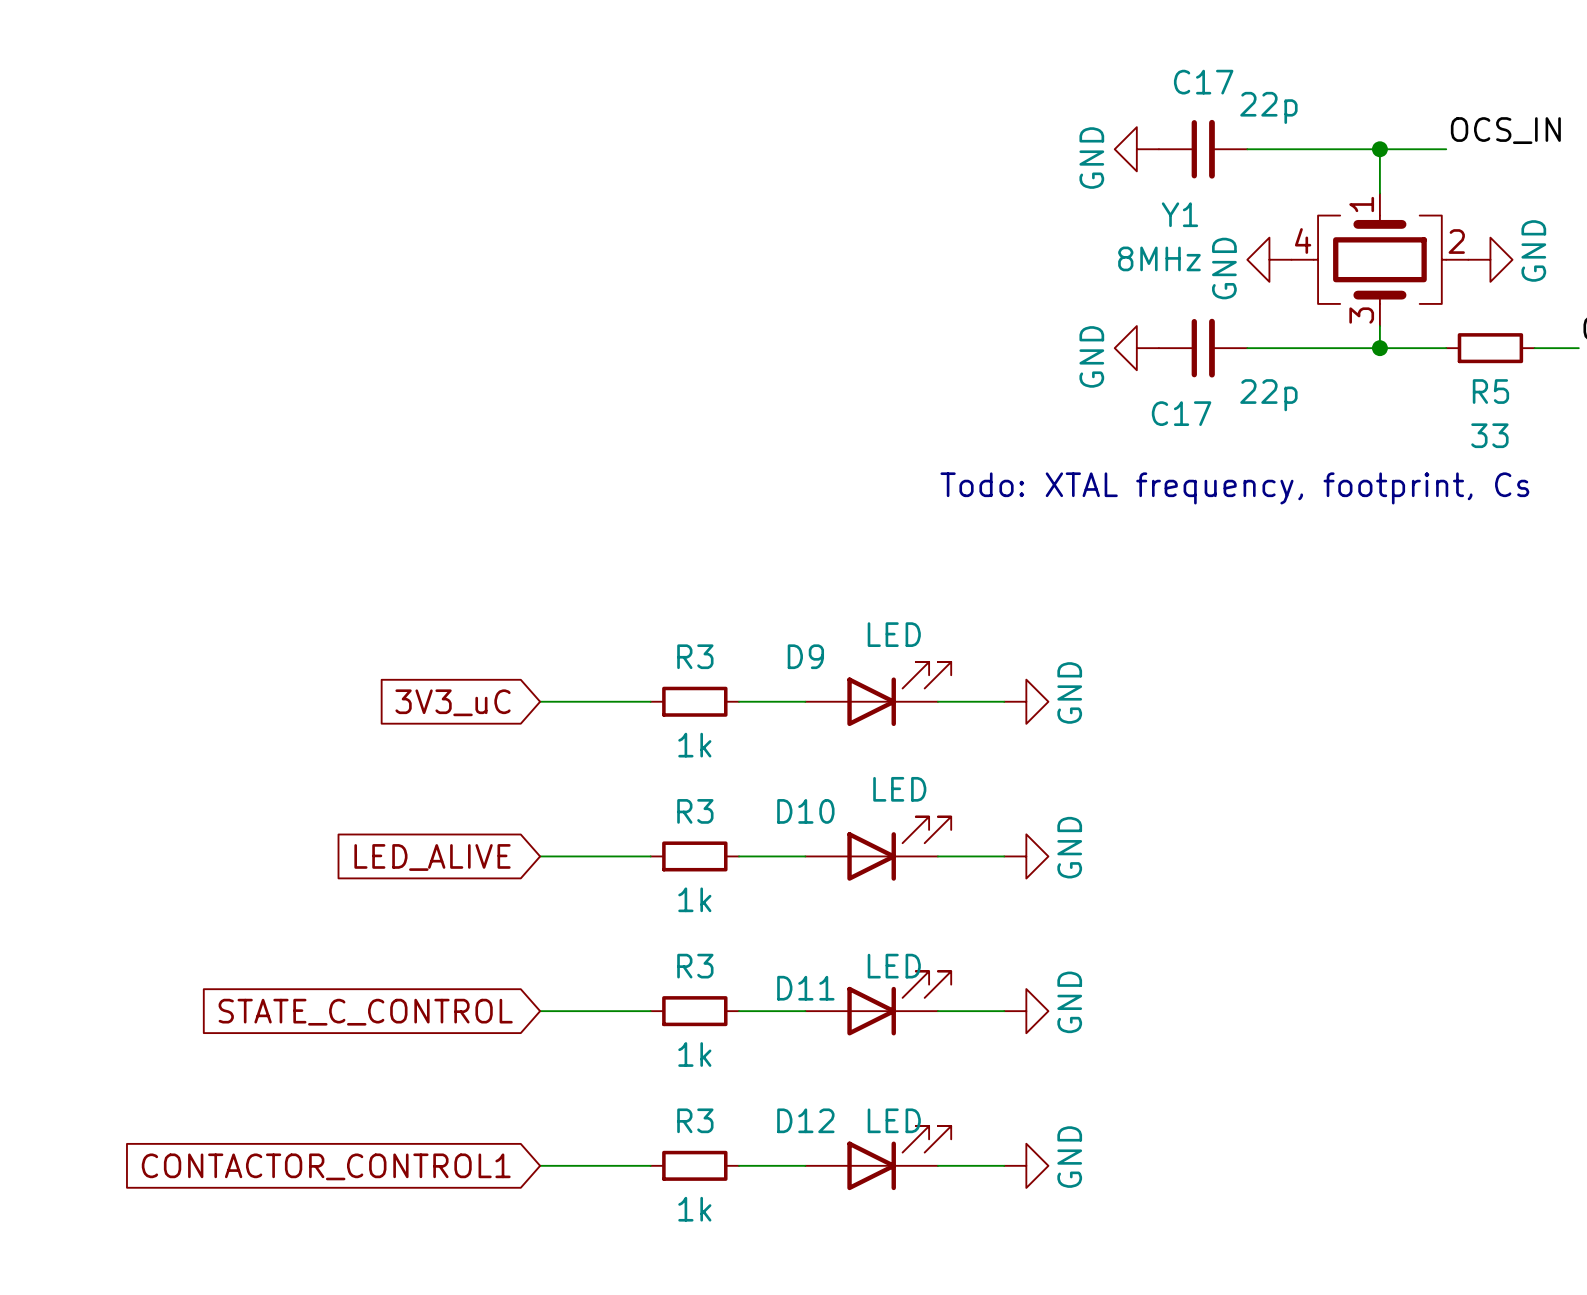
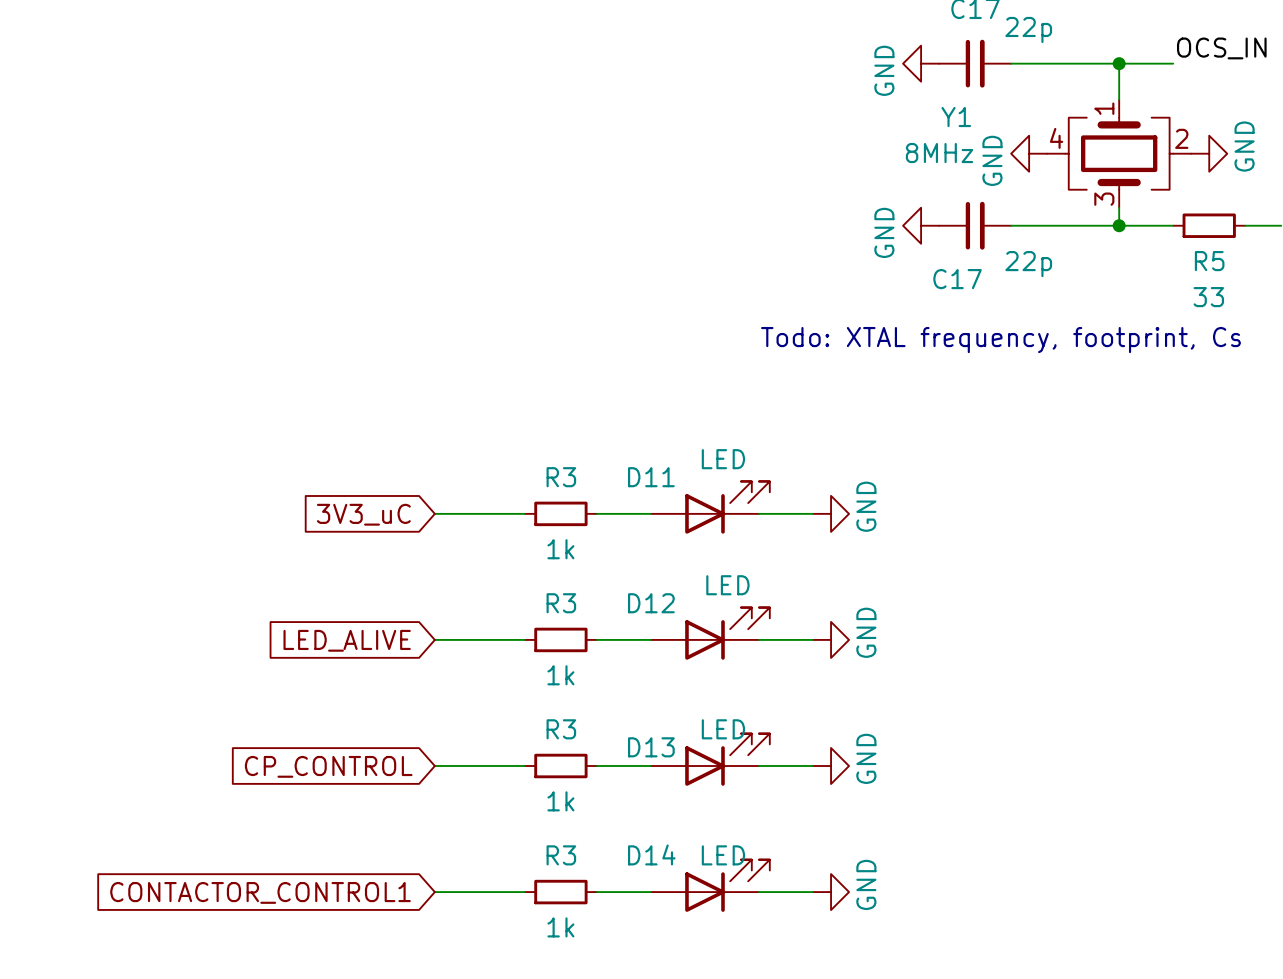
D9 name: D9 (805, 656) -> D11 (651, 477)
D10 name: D10 (805, 811) -> D12 (651, 603)
D11 name: D11 (805, 988) -> D13 (651, 747)
global label: STATE_C_CONTROL (365, 1012) -> CP_CONTROL (328, 766)
D12 name: D12 (805, 1120) -> D14 (651, 854)

